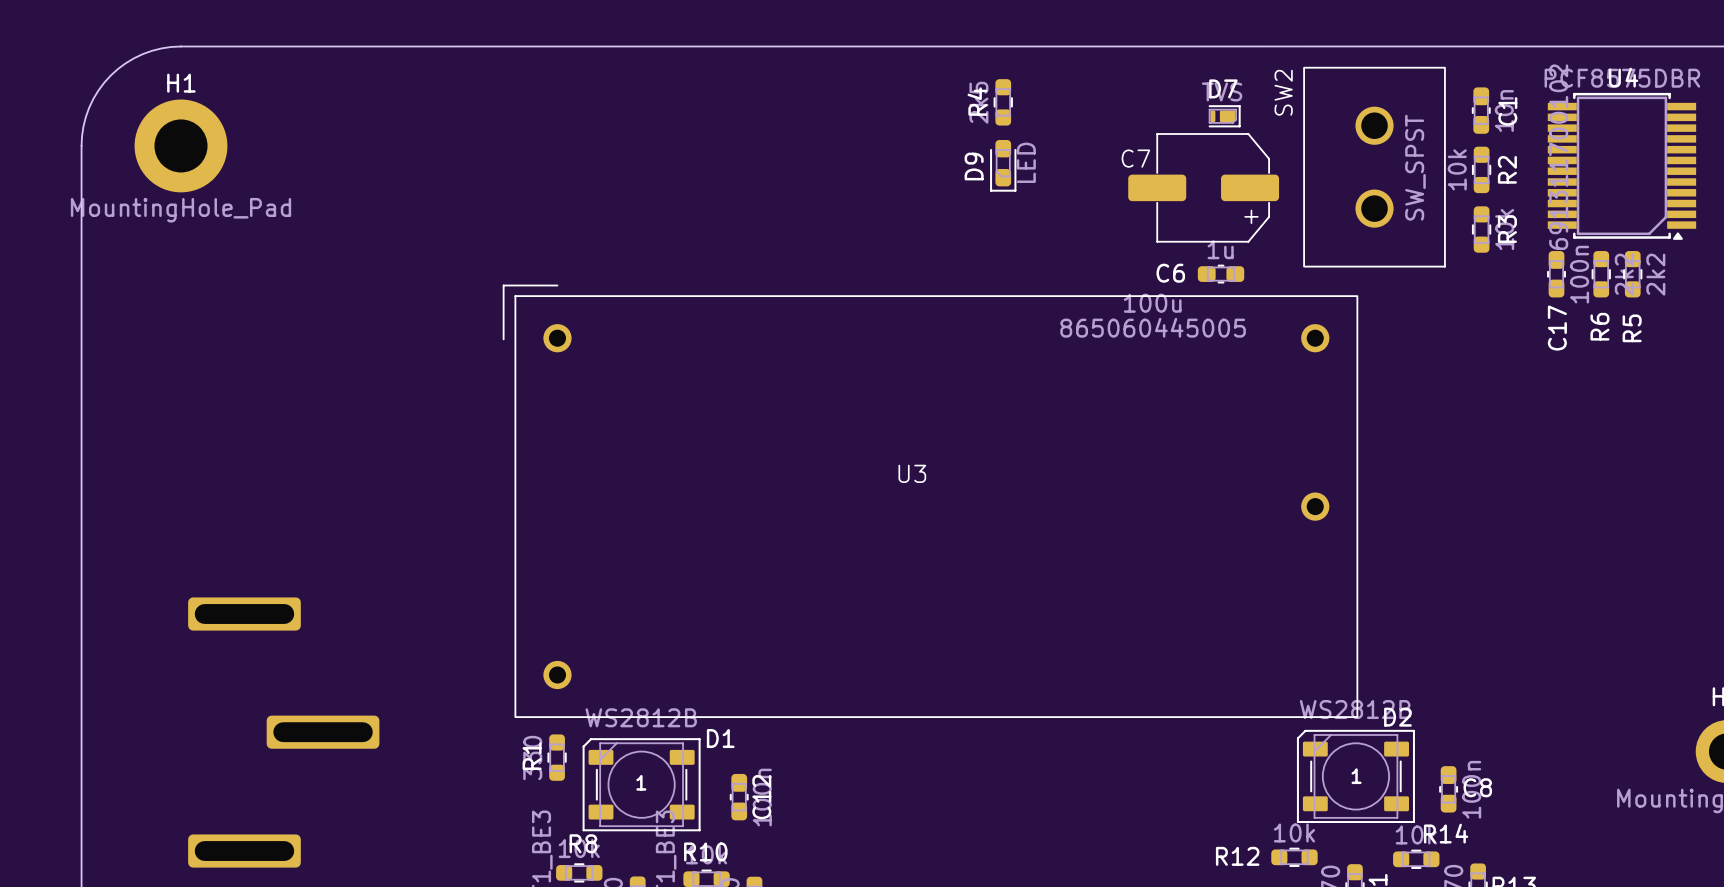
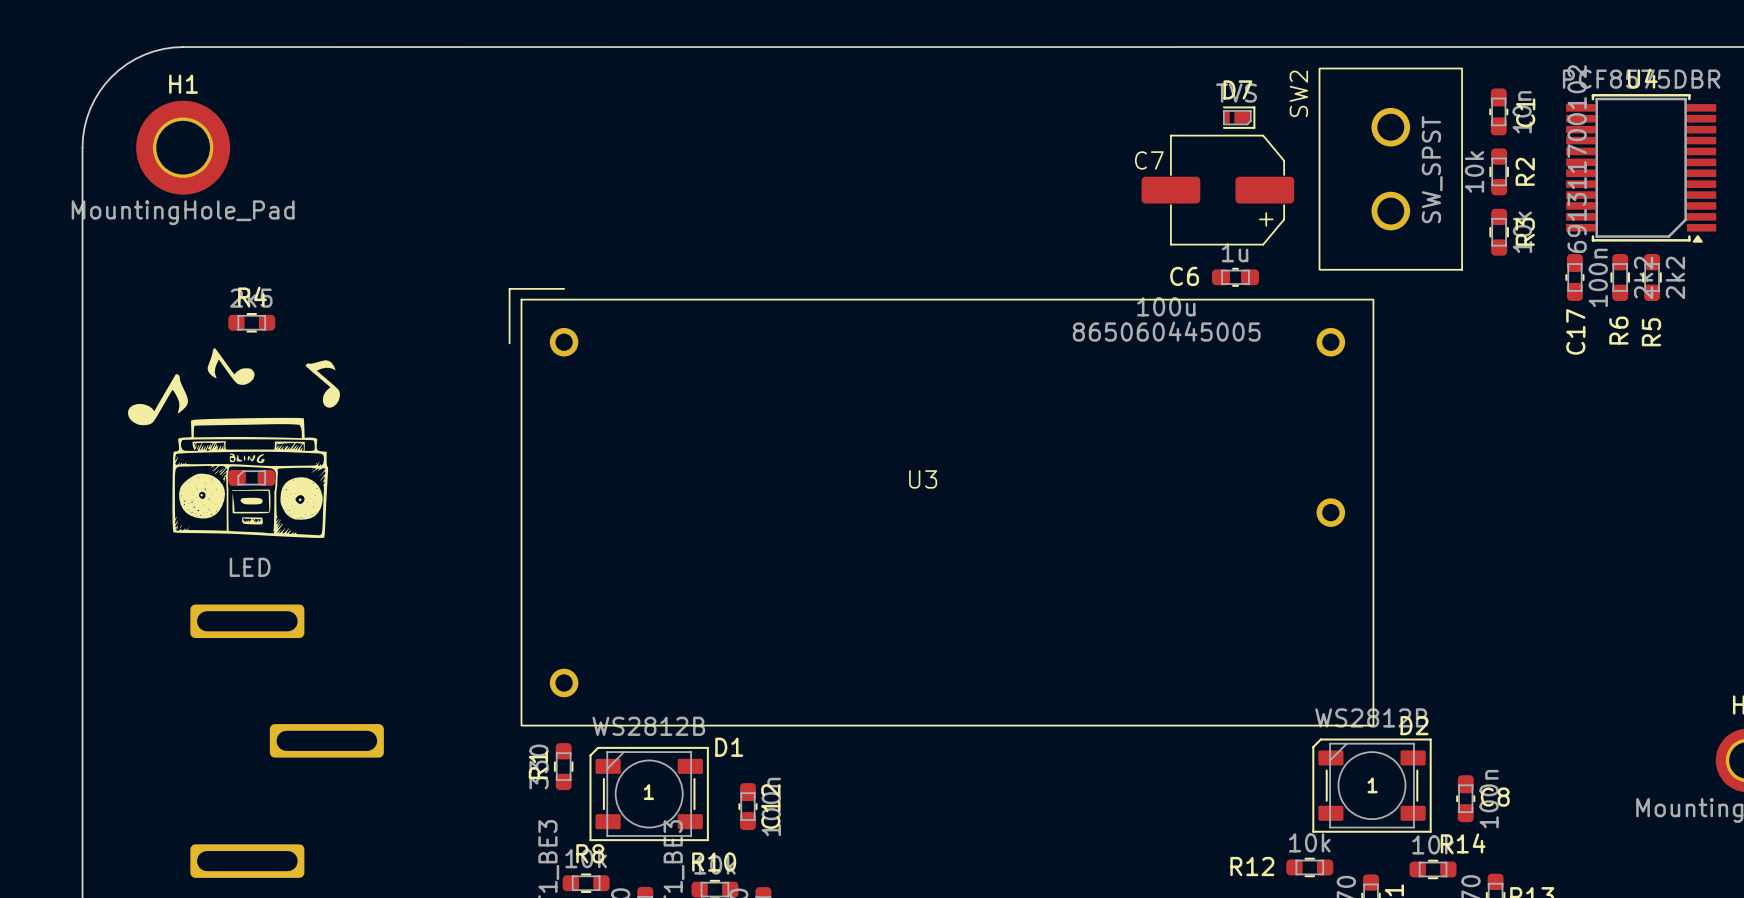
R4 rotation: 0° (1003, 102) -> 90° clockwise (251, 322)
R4 position: (1003, 102) -> (251, 322)
D9: LED (1003, 165) -> none
part: none -> LED (233, 443)

